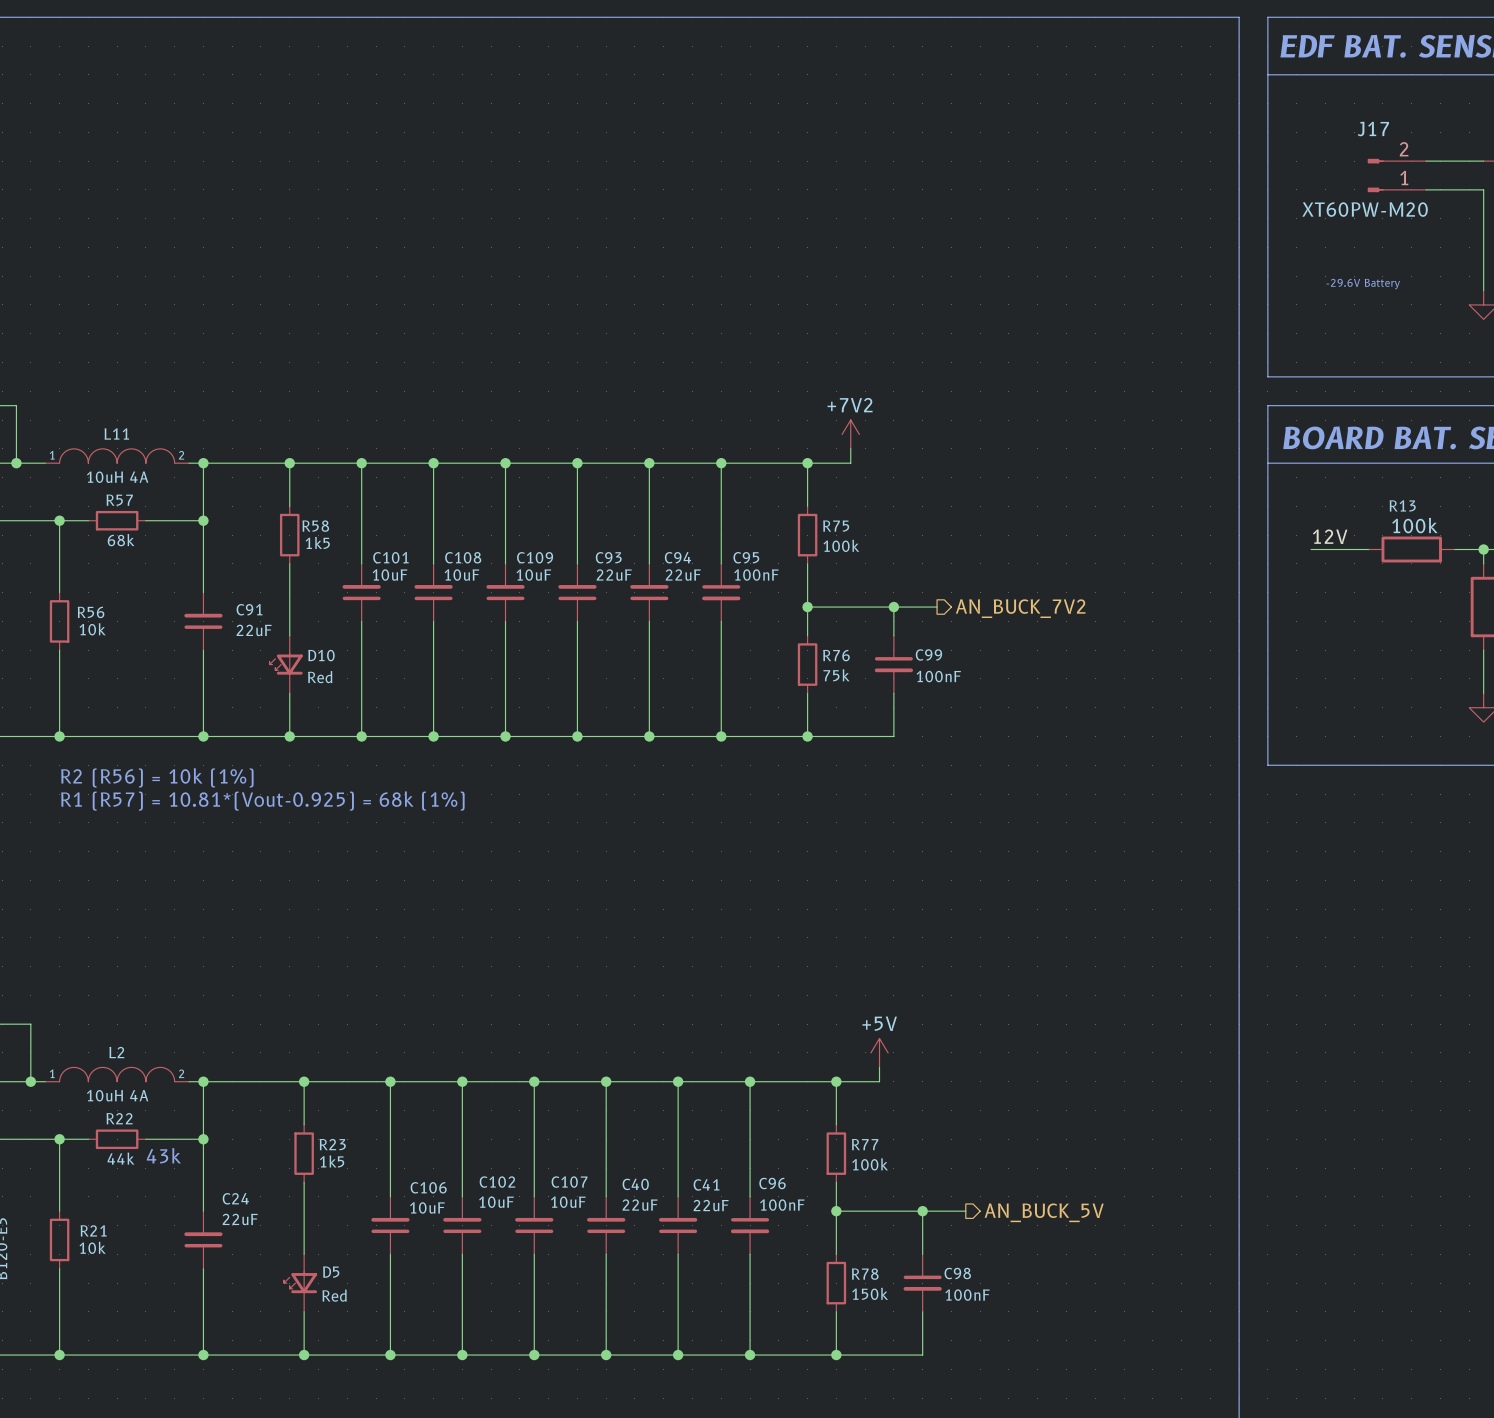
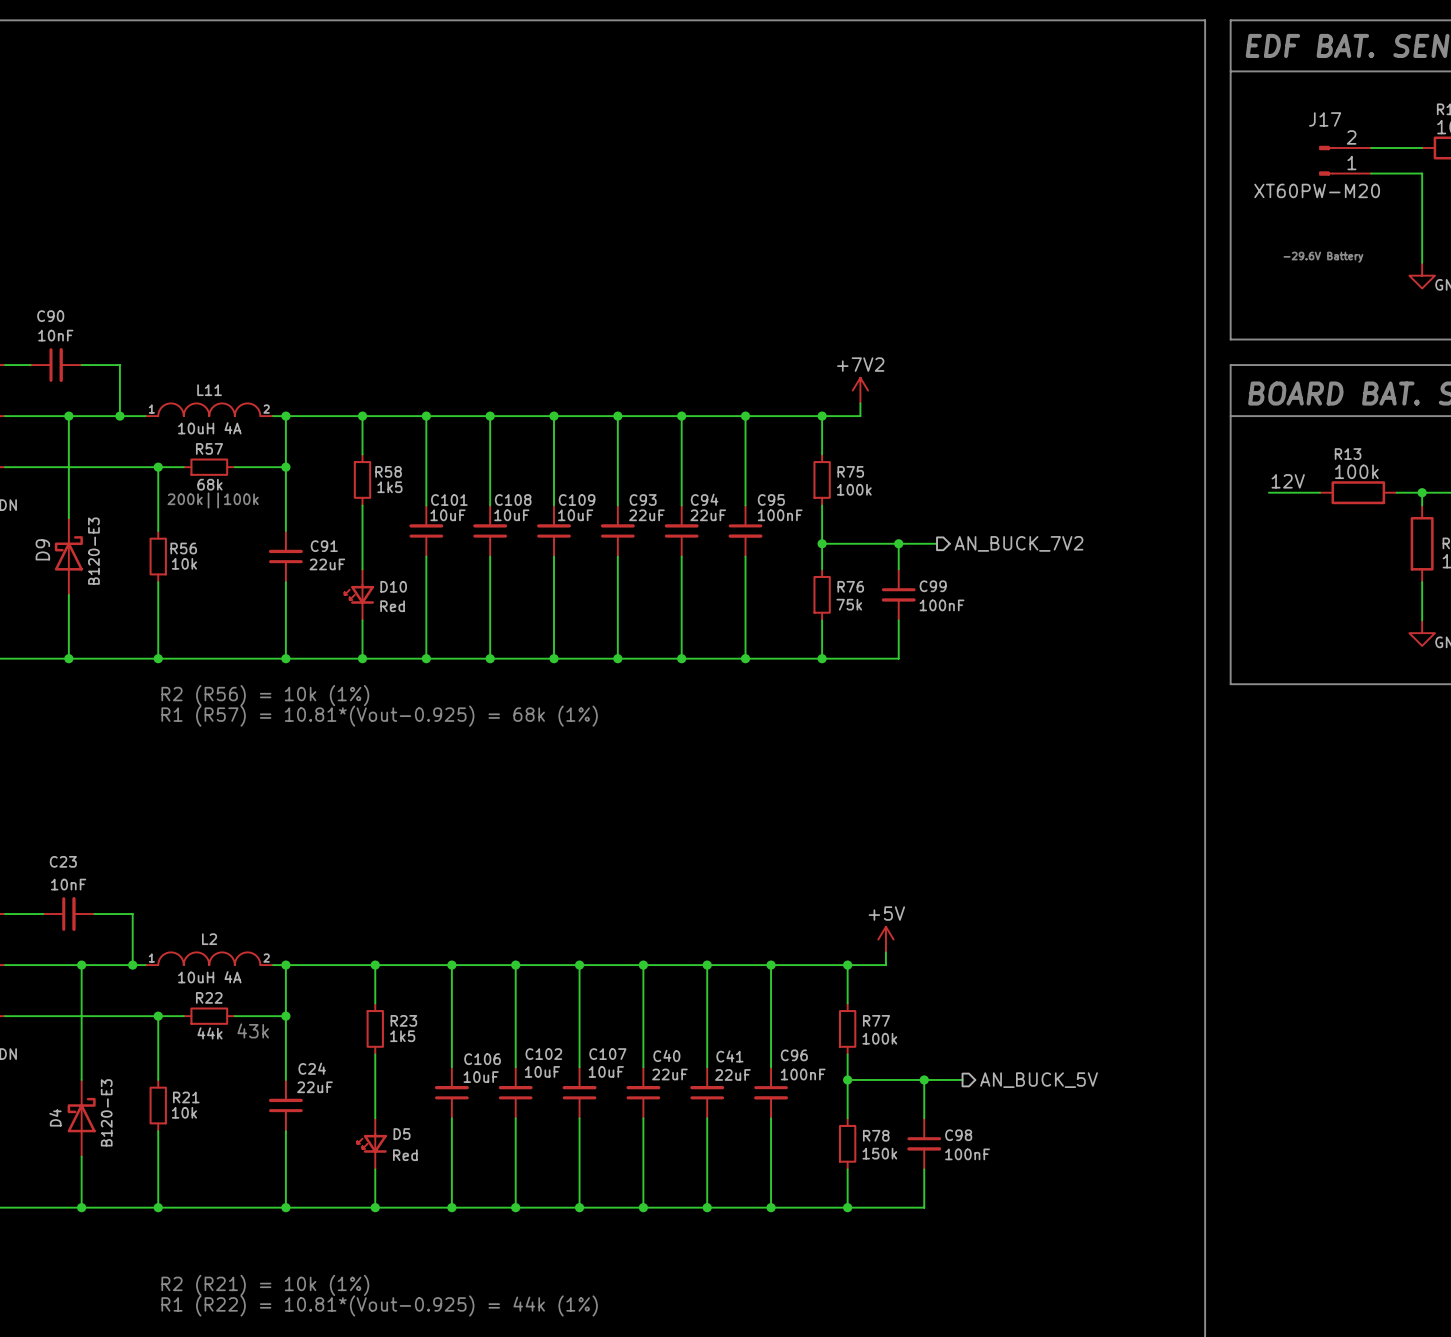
text: none -> 200k||100k (213, 500)

